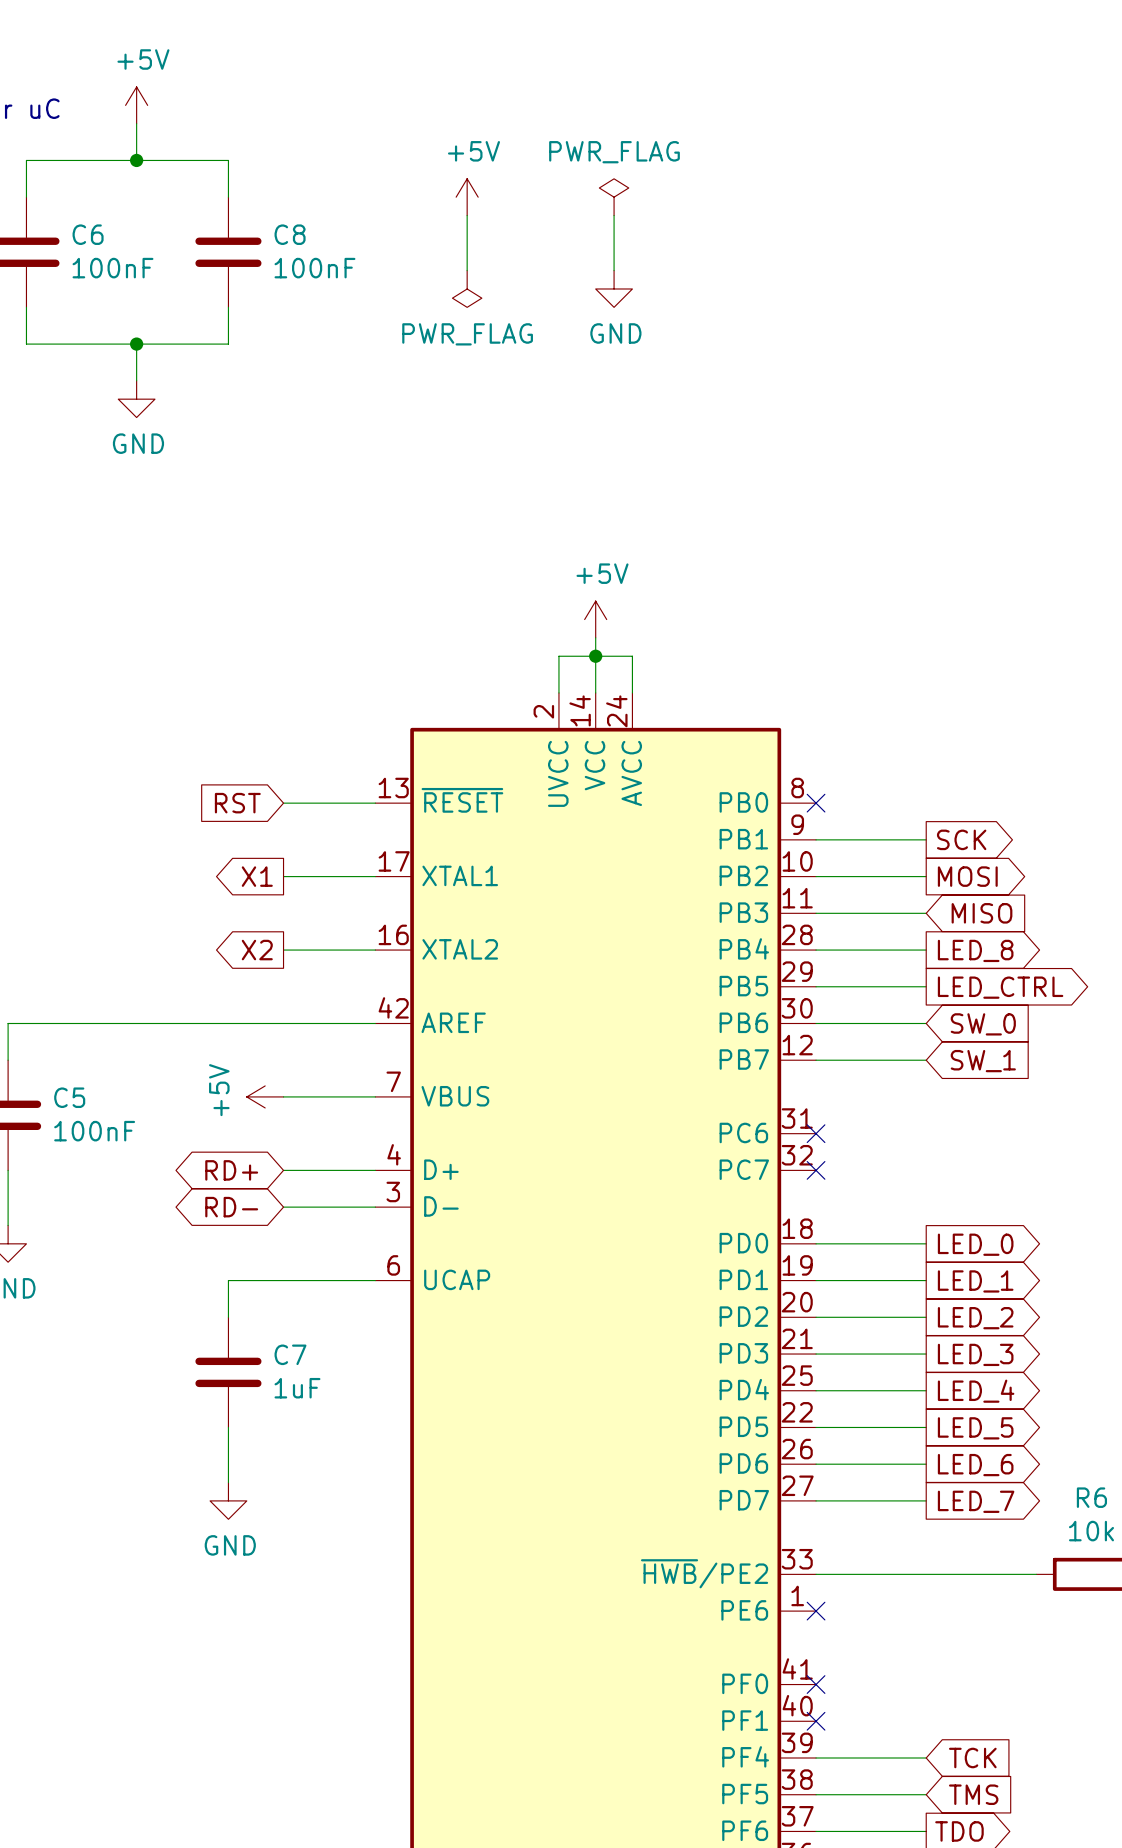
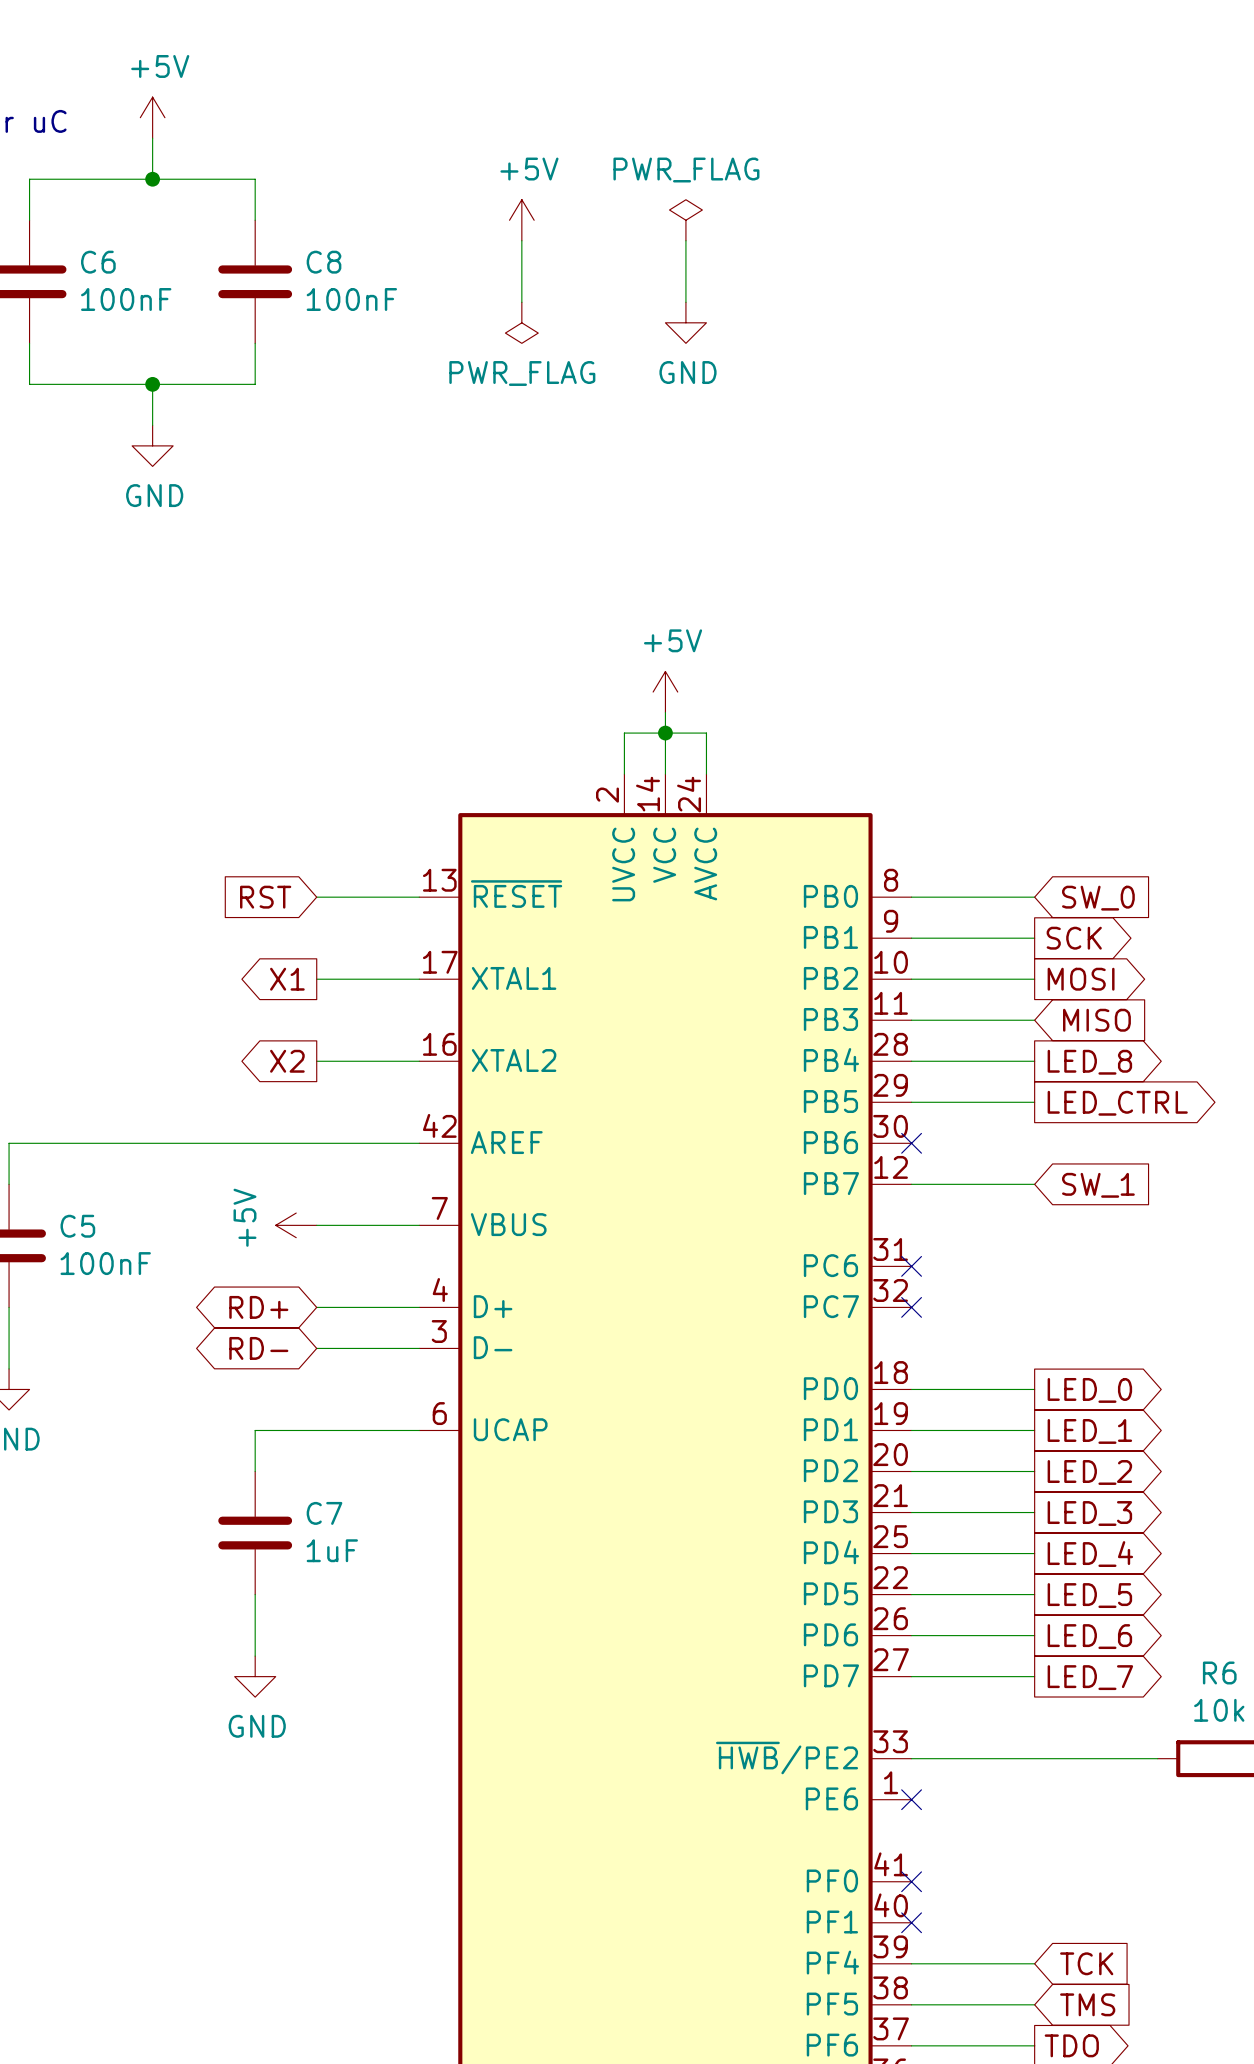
no-connect mark: (816, 803) -> none
wire: (816, 1023) (926, 1023) -> (911, 897) (1034, 897)
no-connect mark: none -> (911, 1143)
global label position: SW_0 (983, 1024) -> SW_0 (1098, 898)

